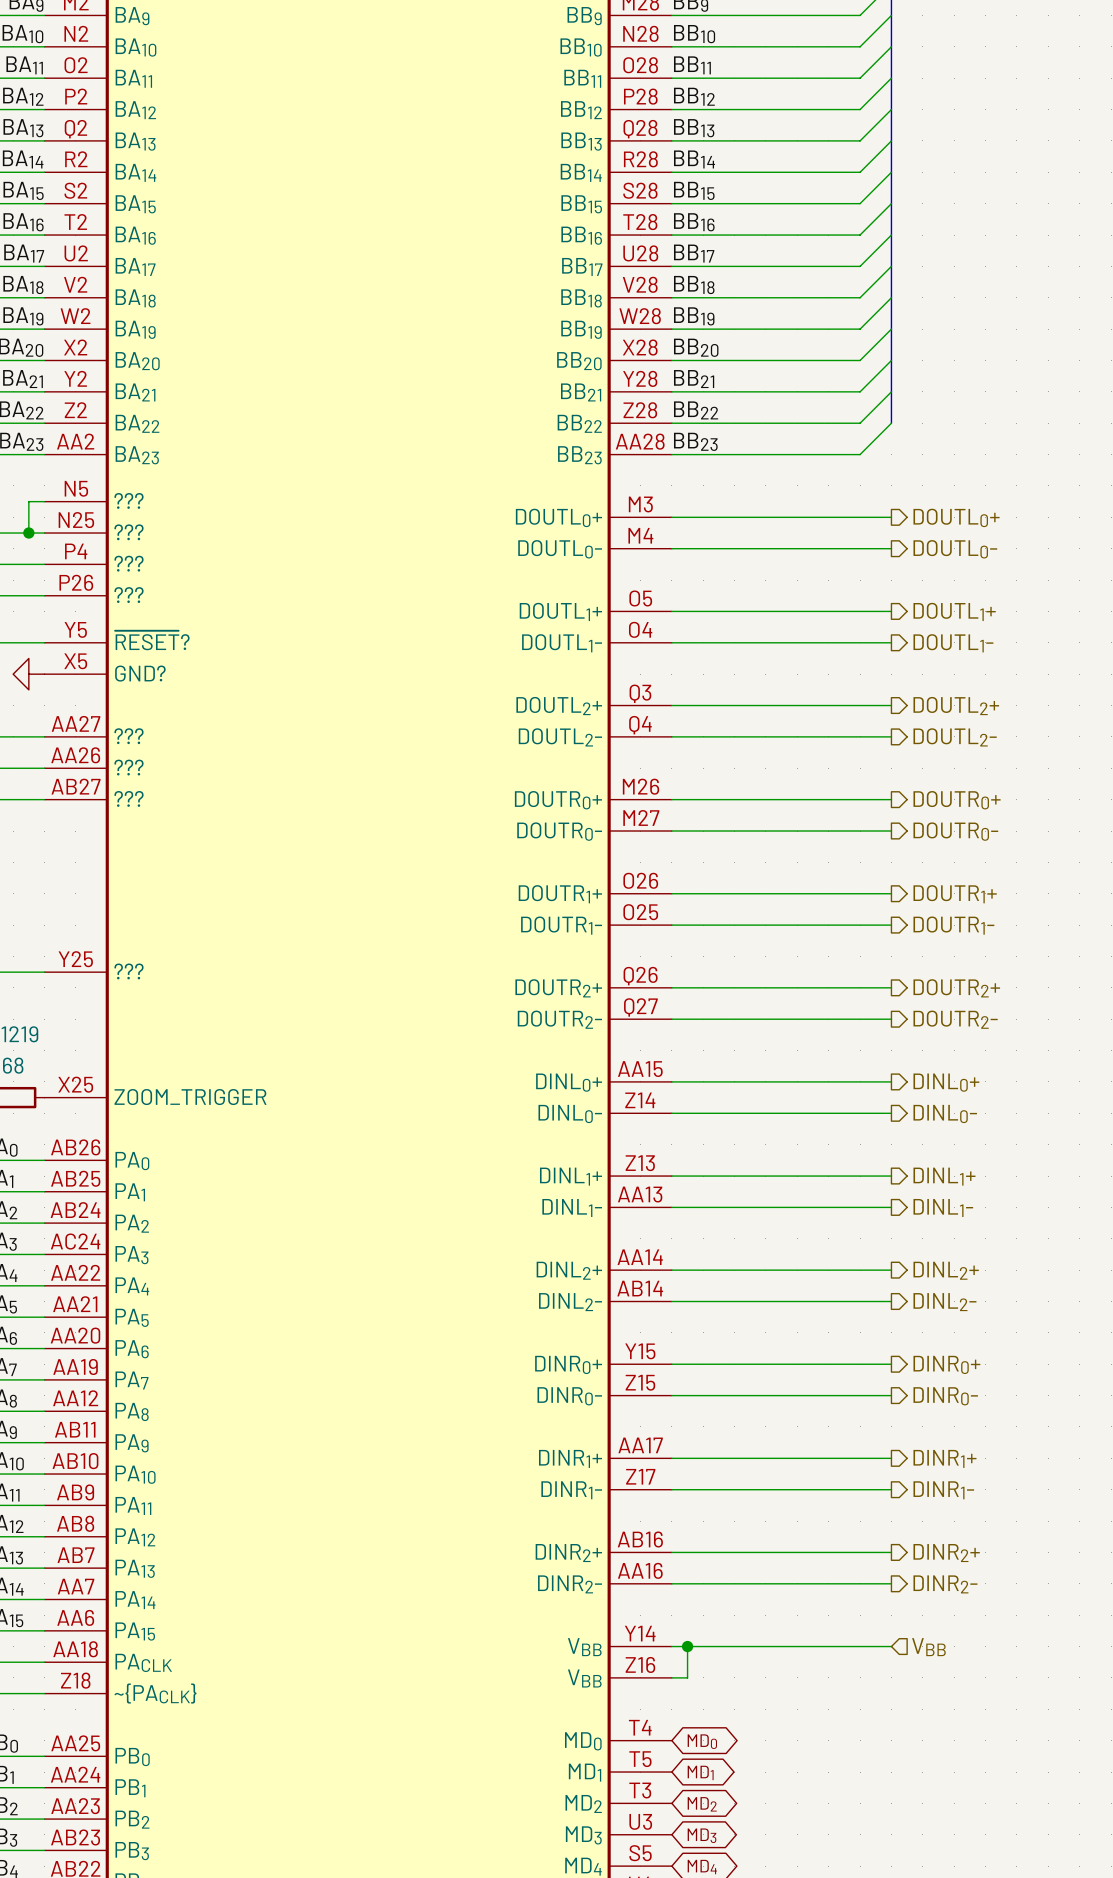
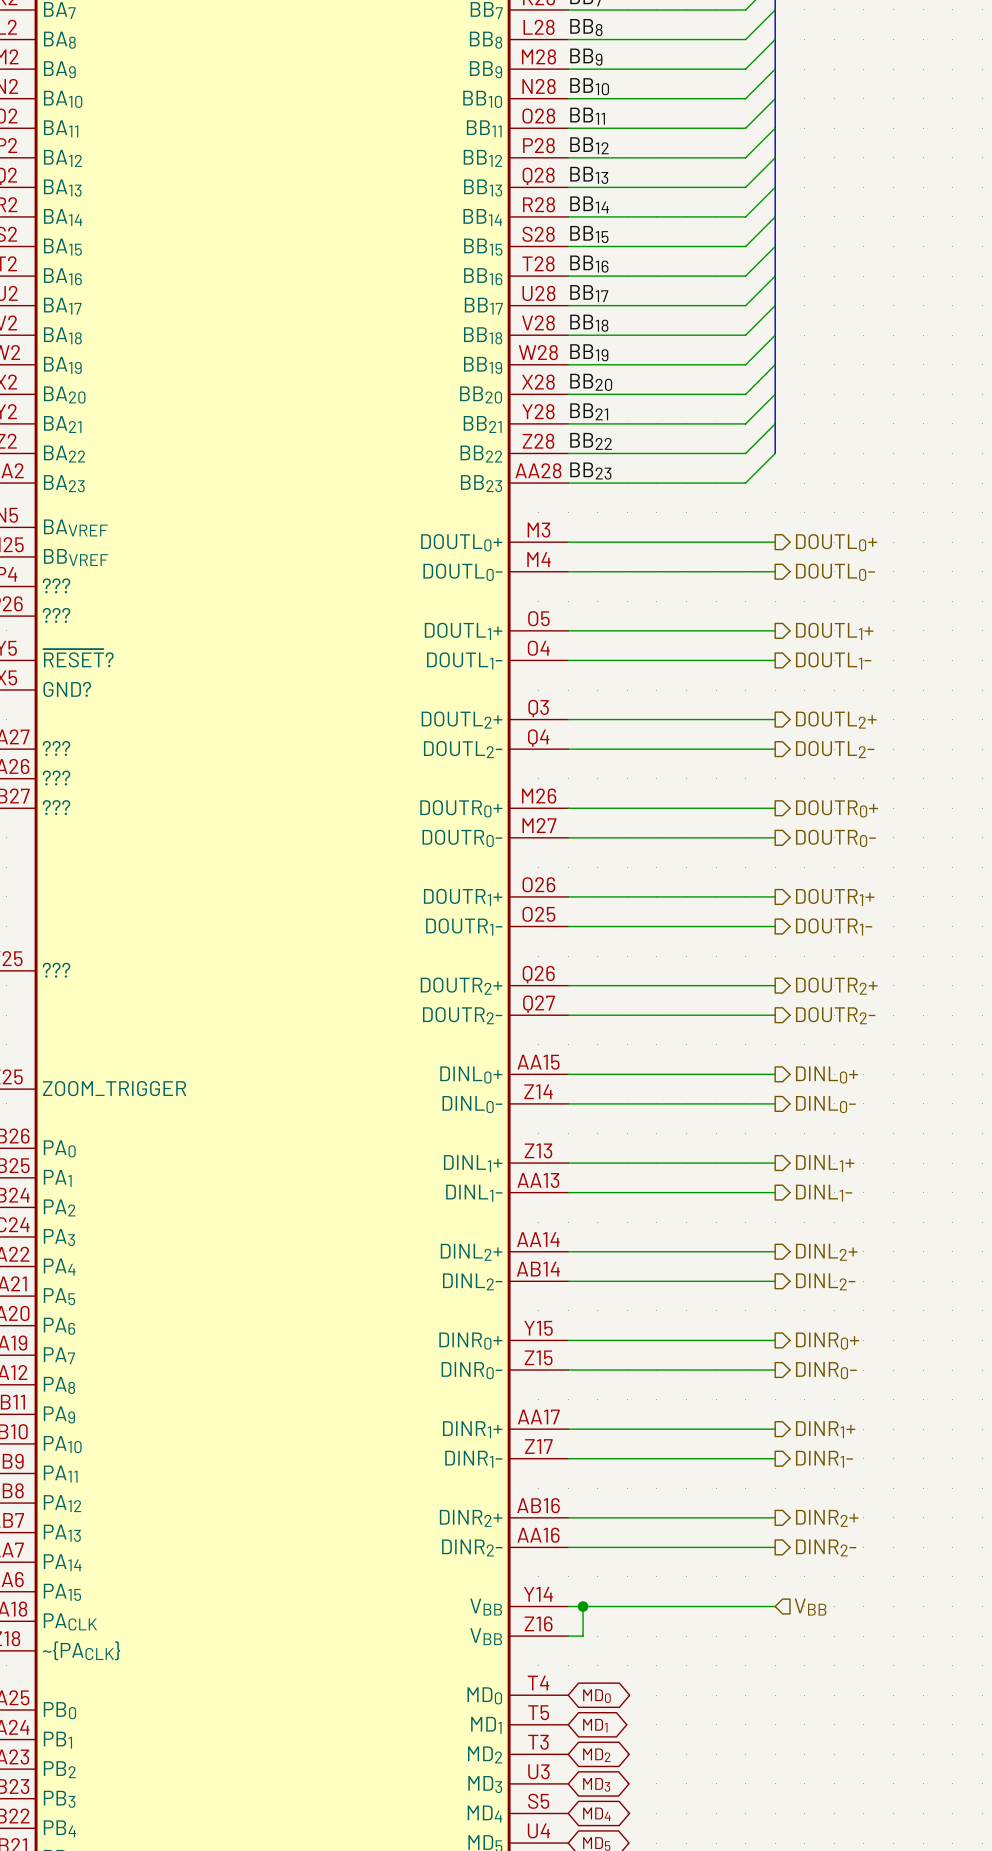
part pin name: ??? (129, 500) -> BAVREF (75, 527)
part pin name: ??? (129, 532) -> BBVREF (76, 557)

